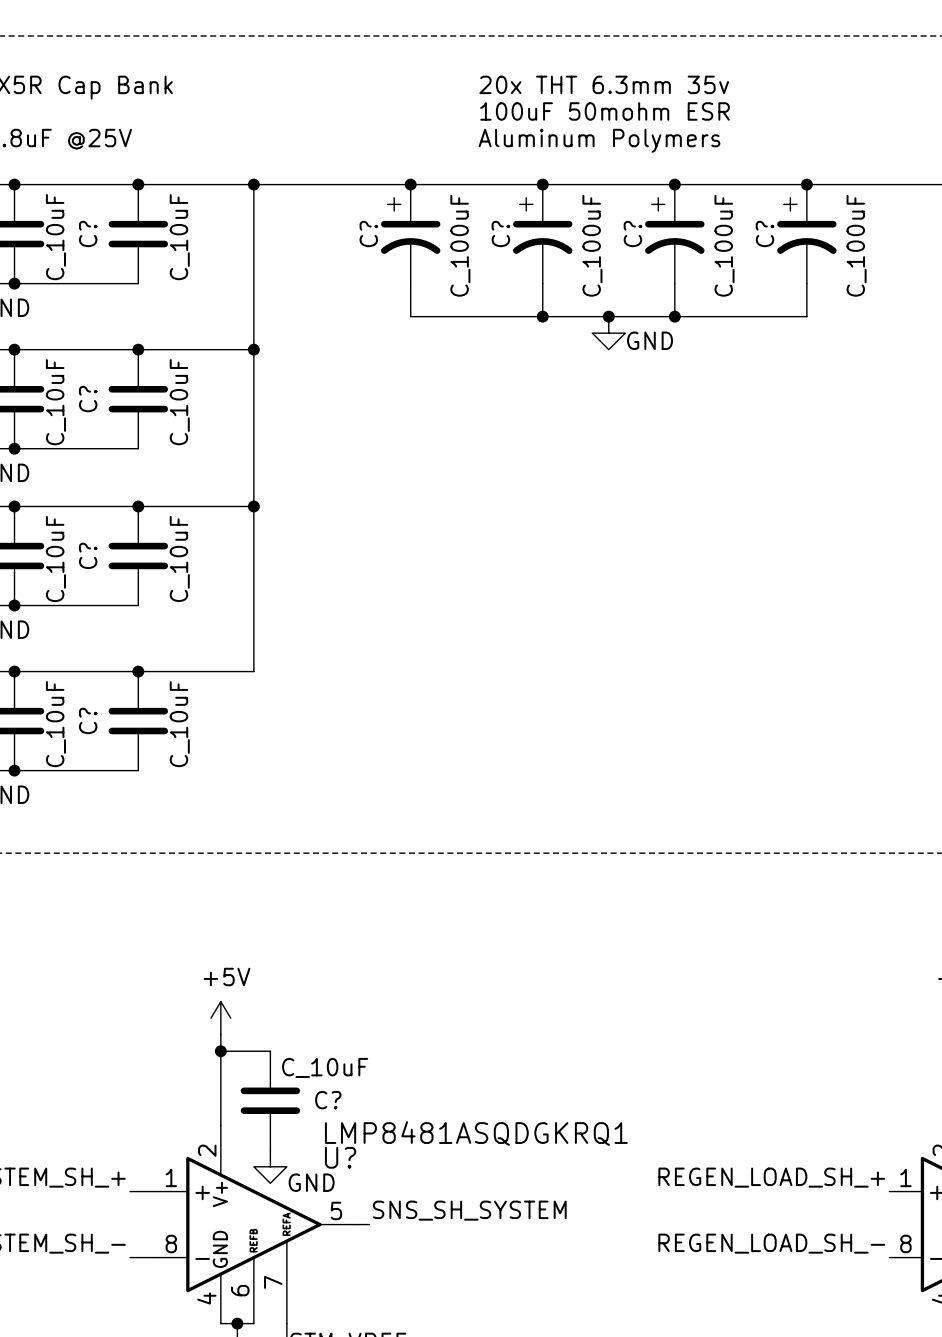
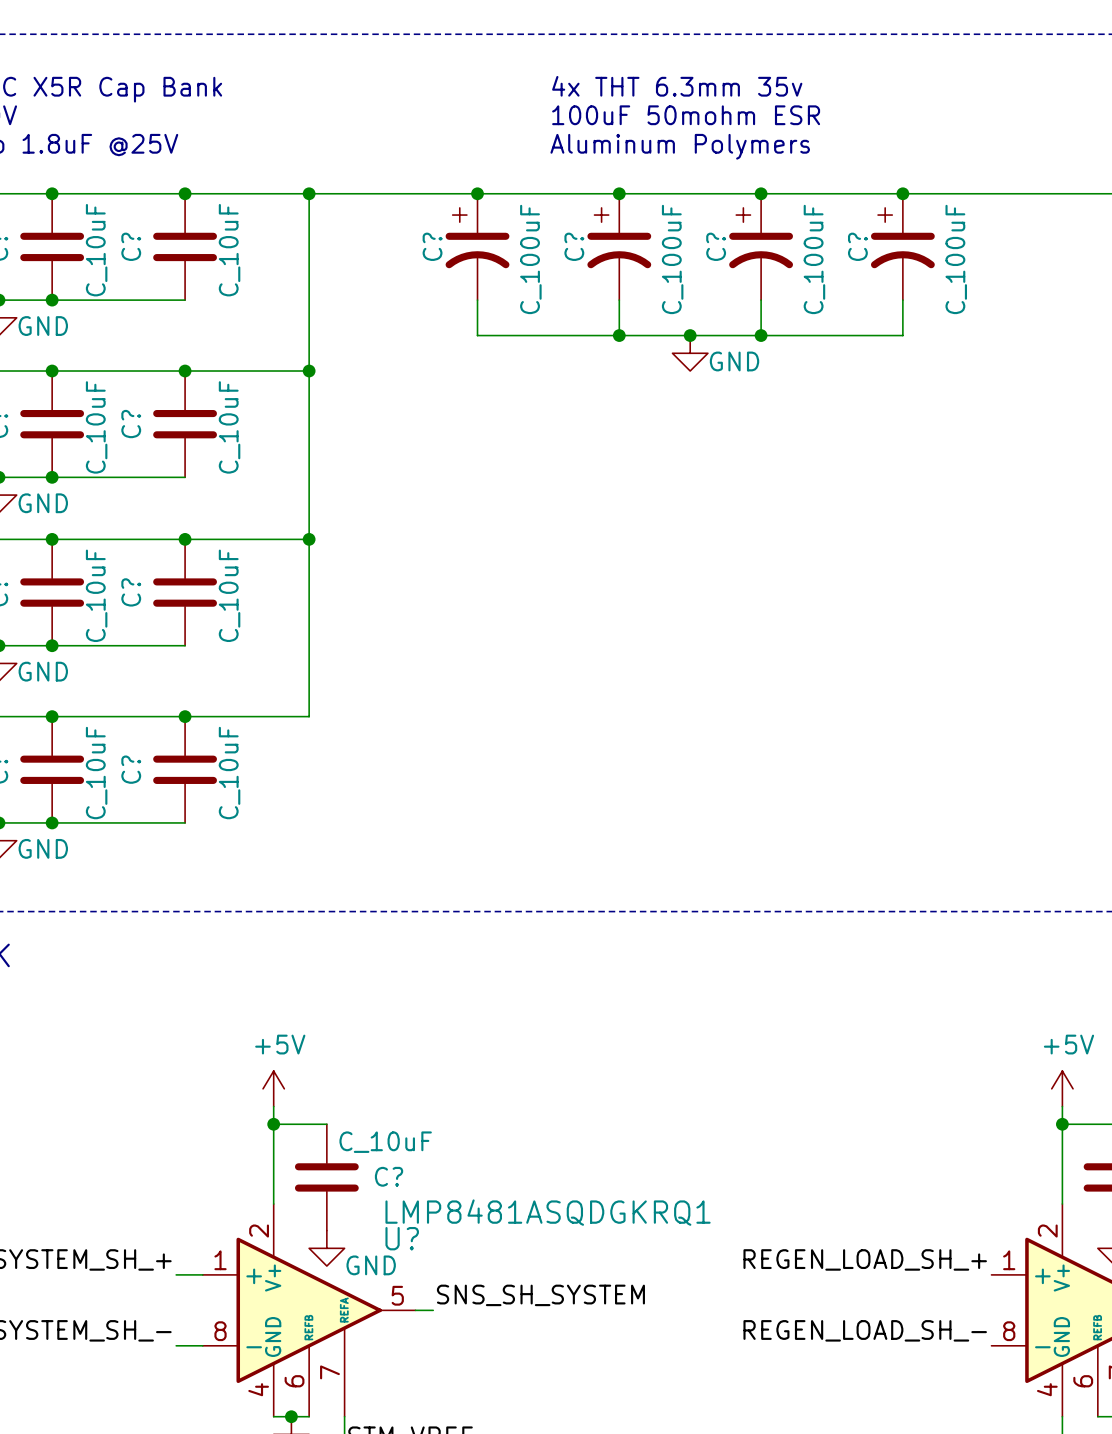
text: 20x THT 6.3mm 35v (604, 84) -> 4x THT 6.3mm 35v (677, 86)

